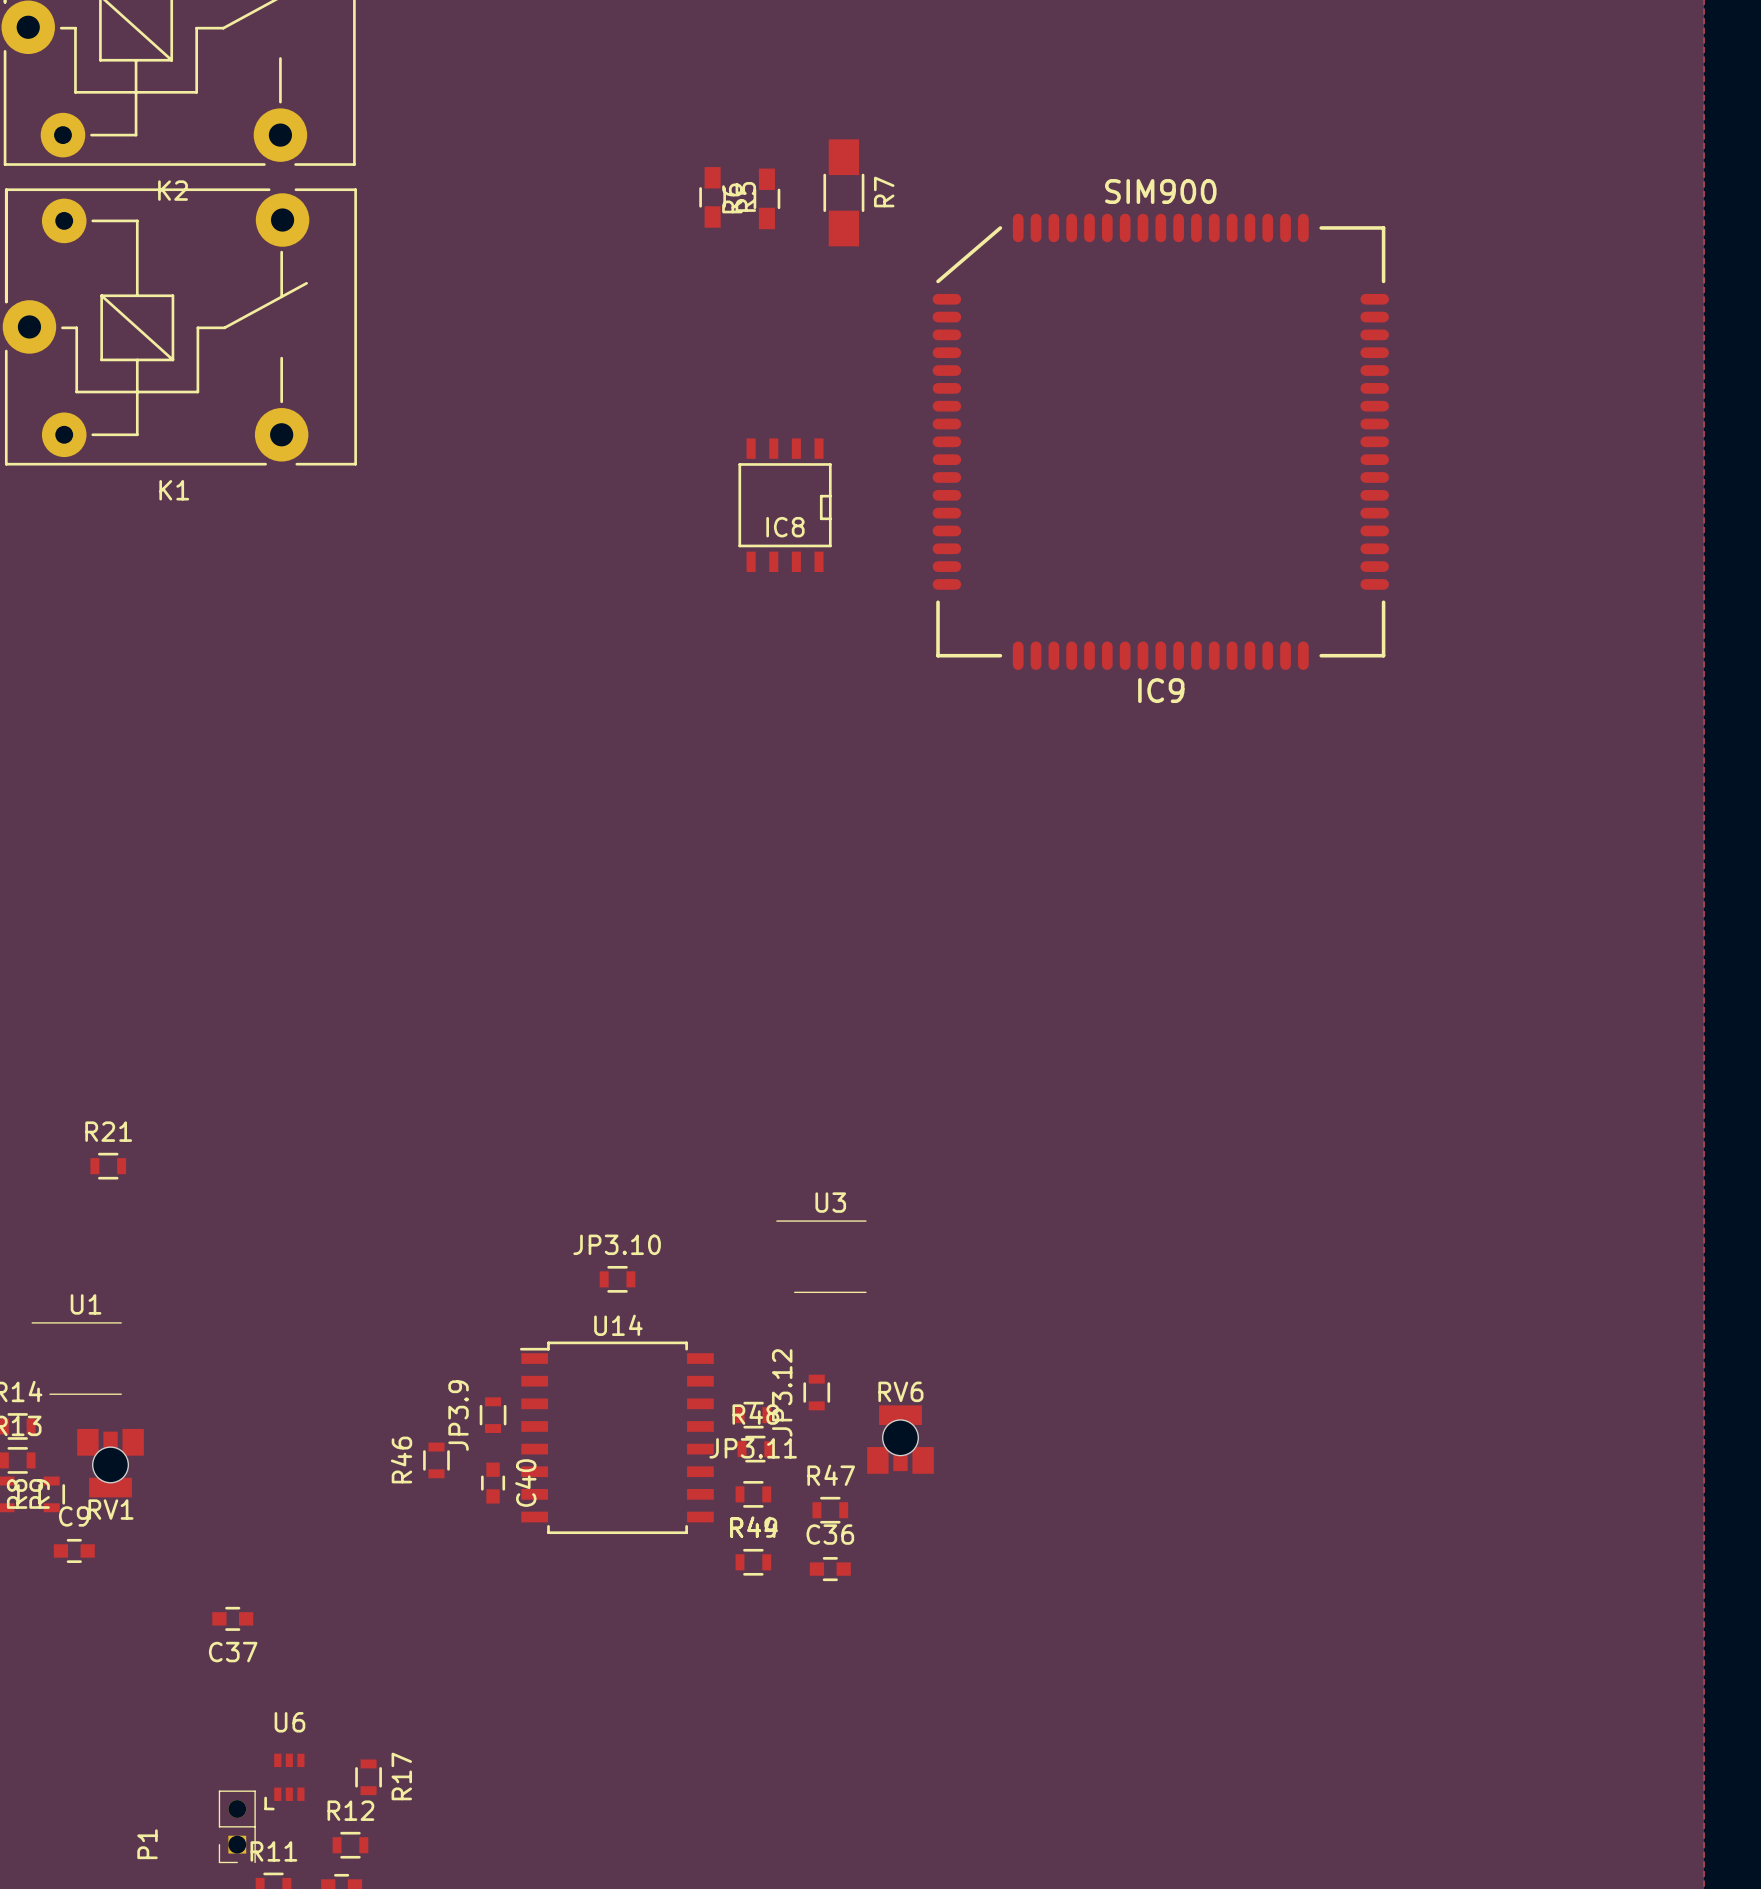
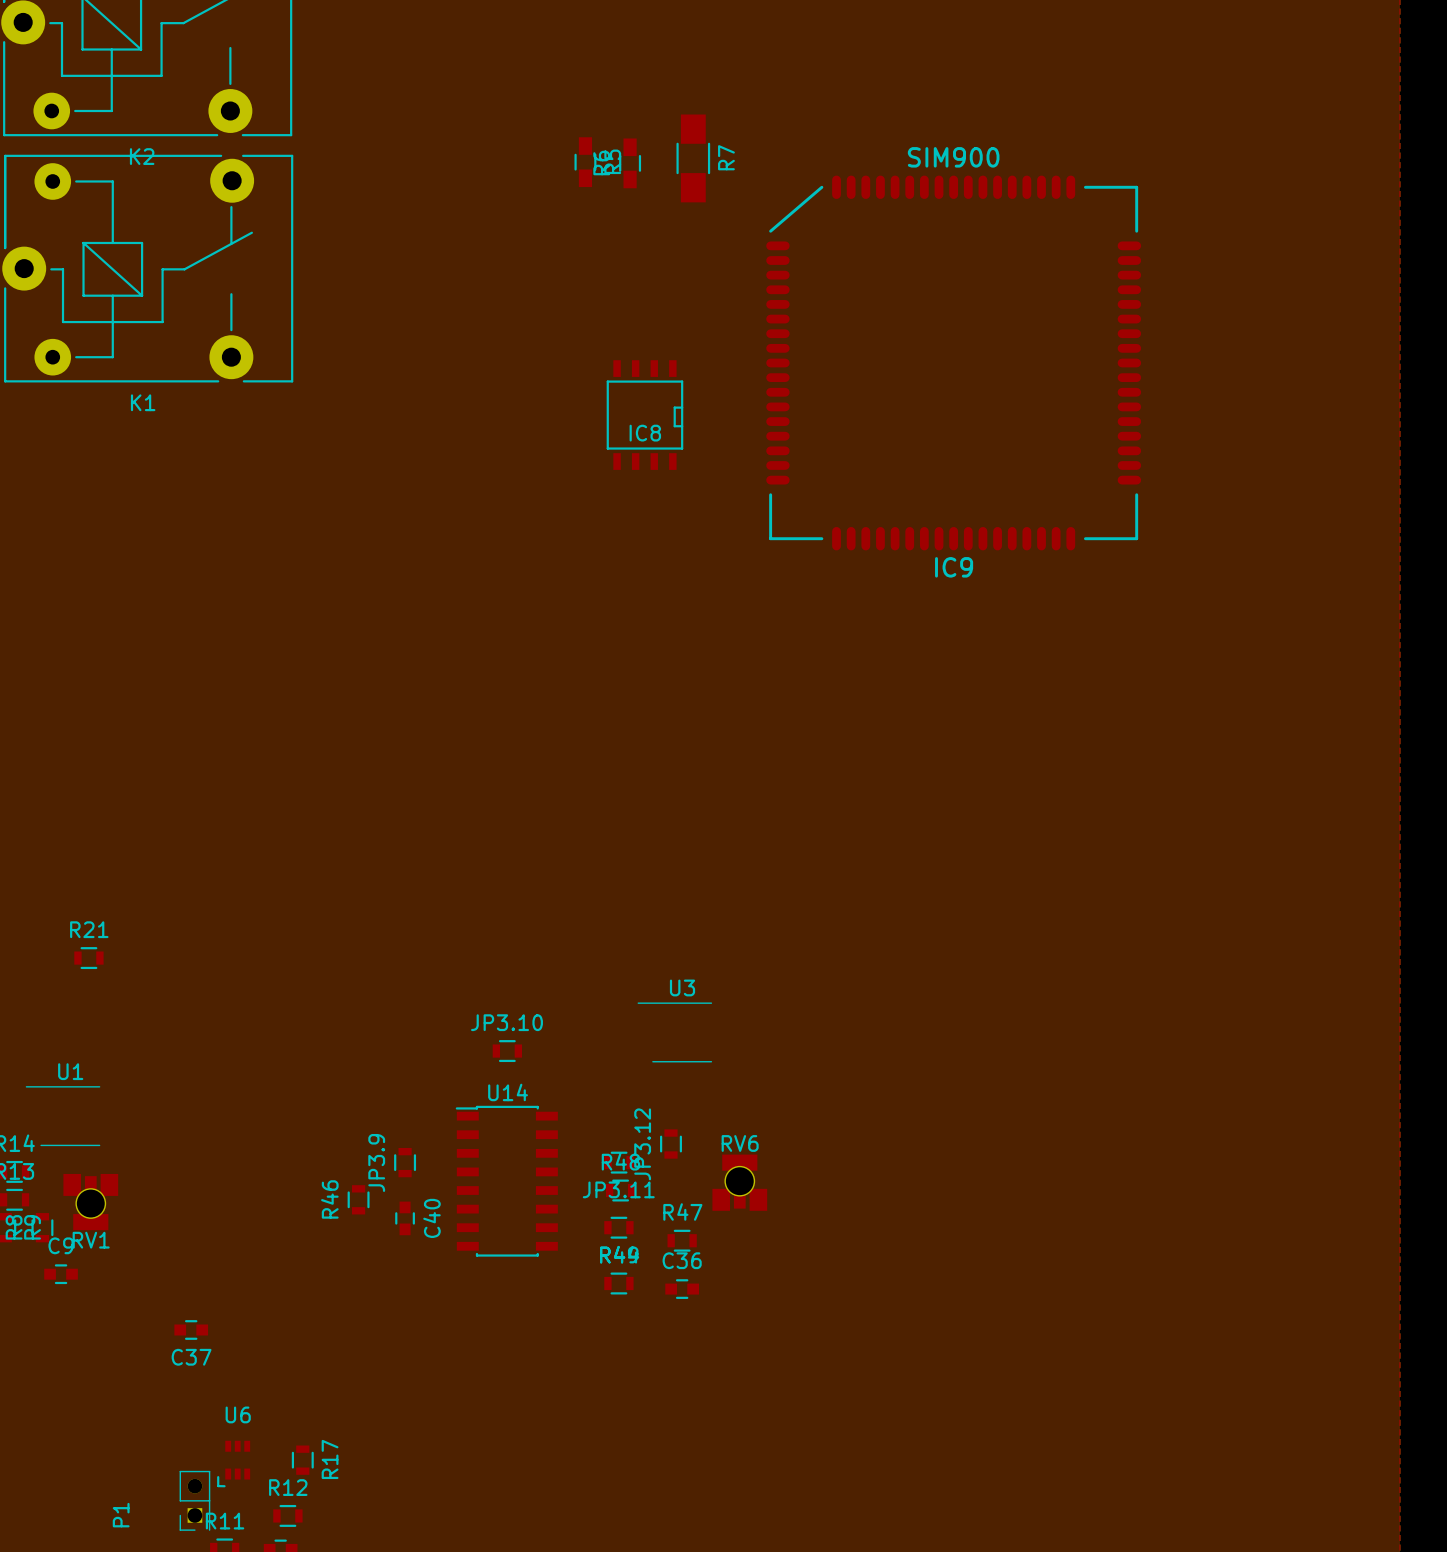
U14 footprint: [519, 1341, 714, 1535] -> [455, 1105, 558, 1257]

